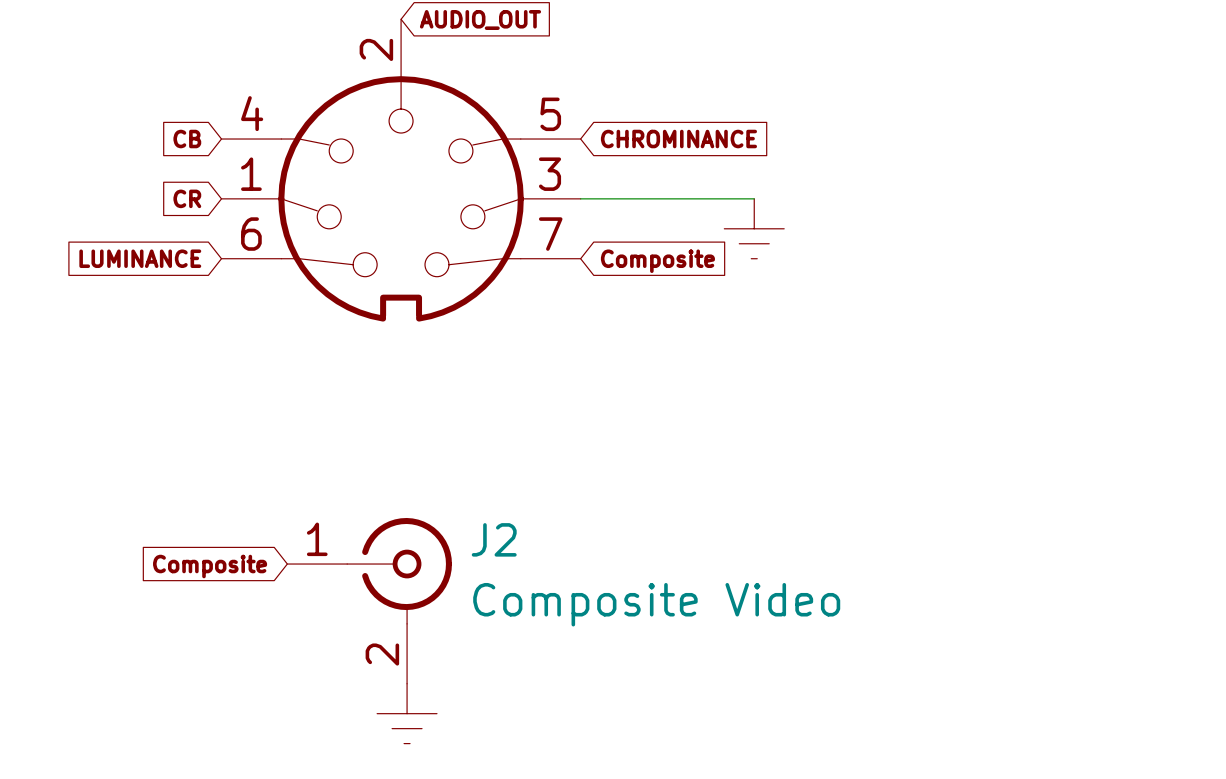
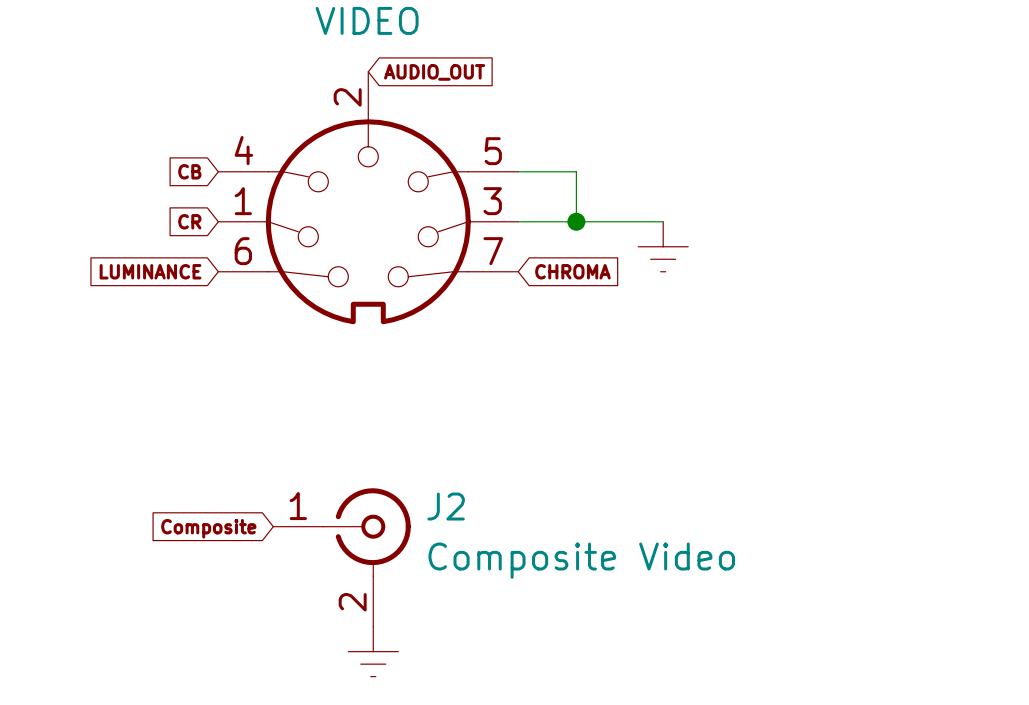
wire: none -> (518, 171) (576, 171) (576, 221)
global label: CHROMINANCE (678, 139) -> none
junction: none -> (576, 221)
global label: Composite (657, 261) -> CHROMA (572, 271)

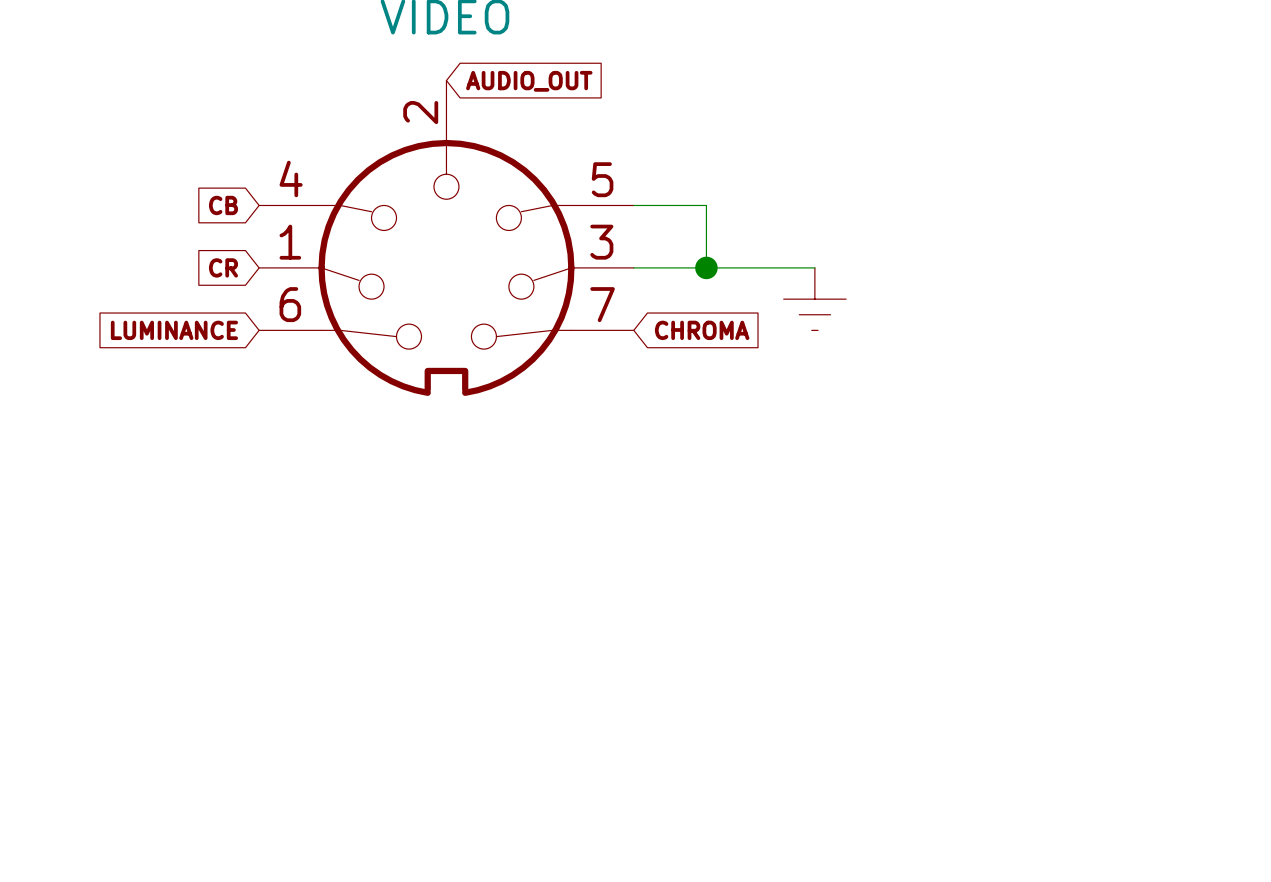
global label: Composite (208, 528) -> none
J2: Composite Video (342, 557) -> none
power symbol: (373, 651) -> none

